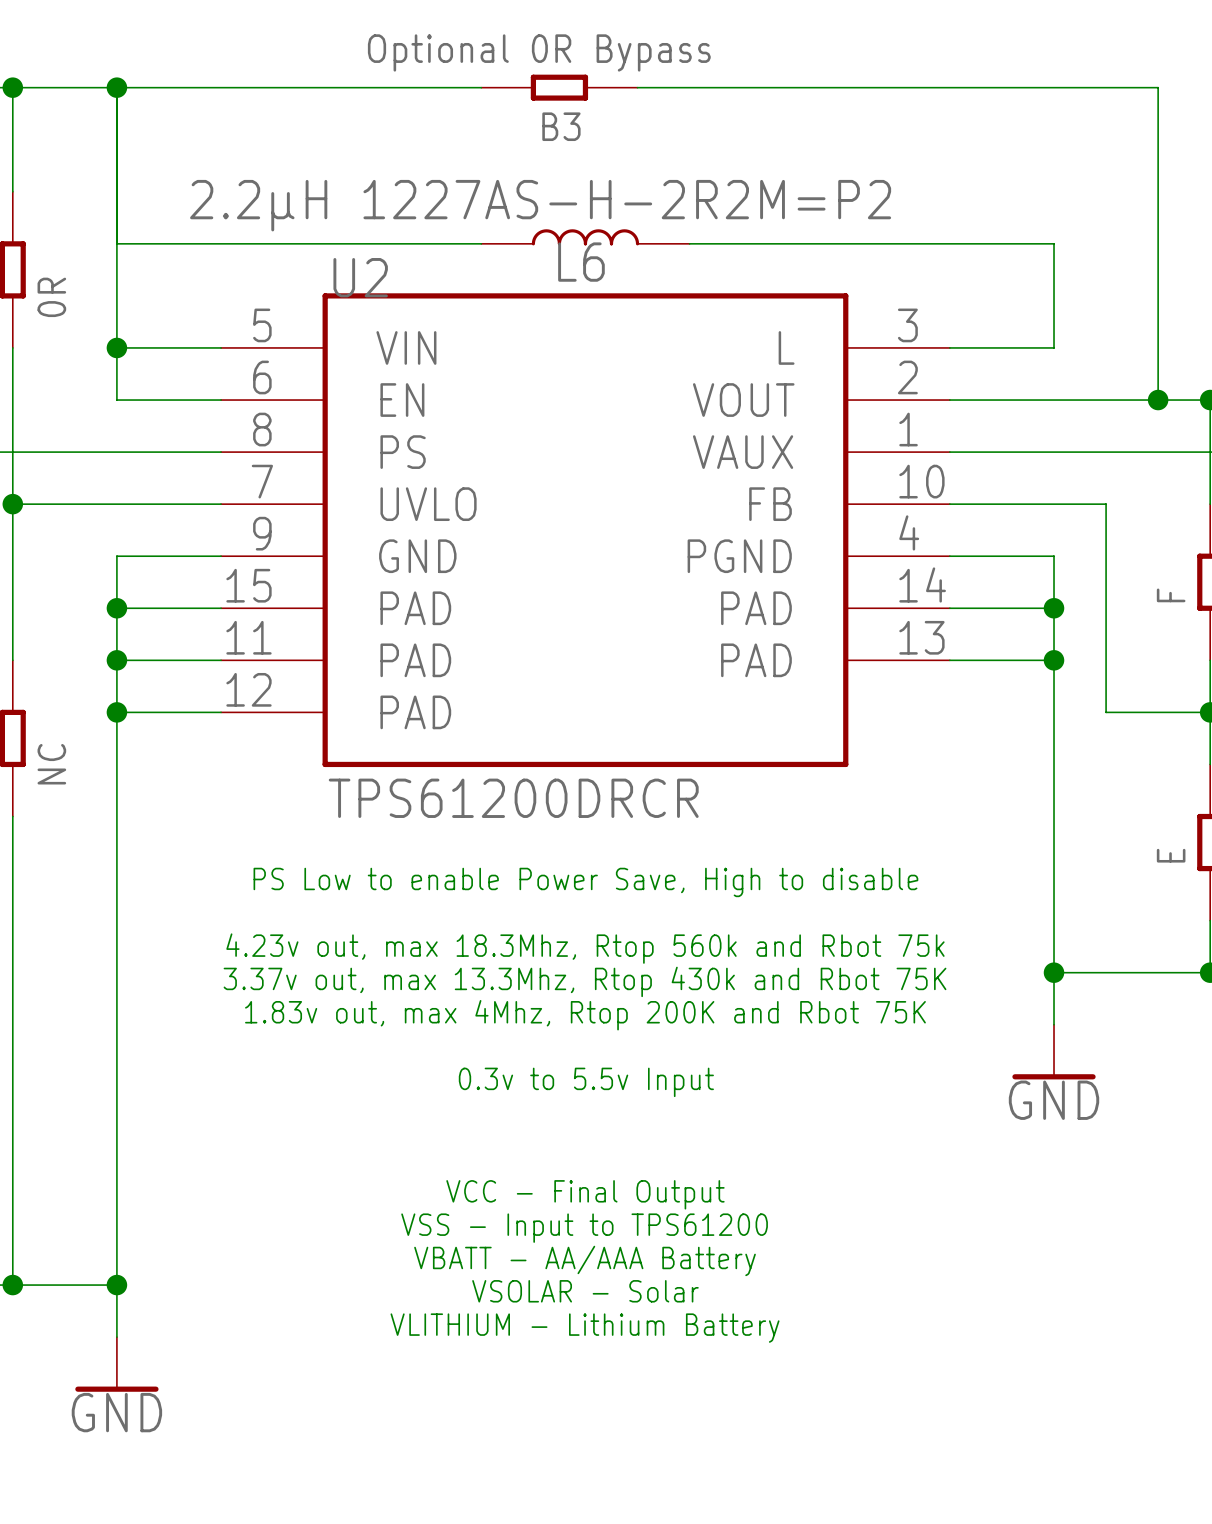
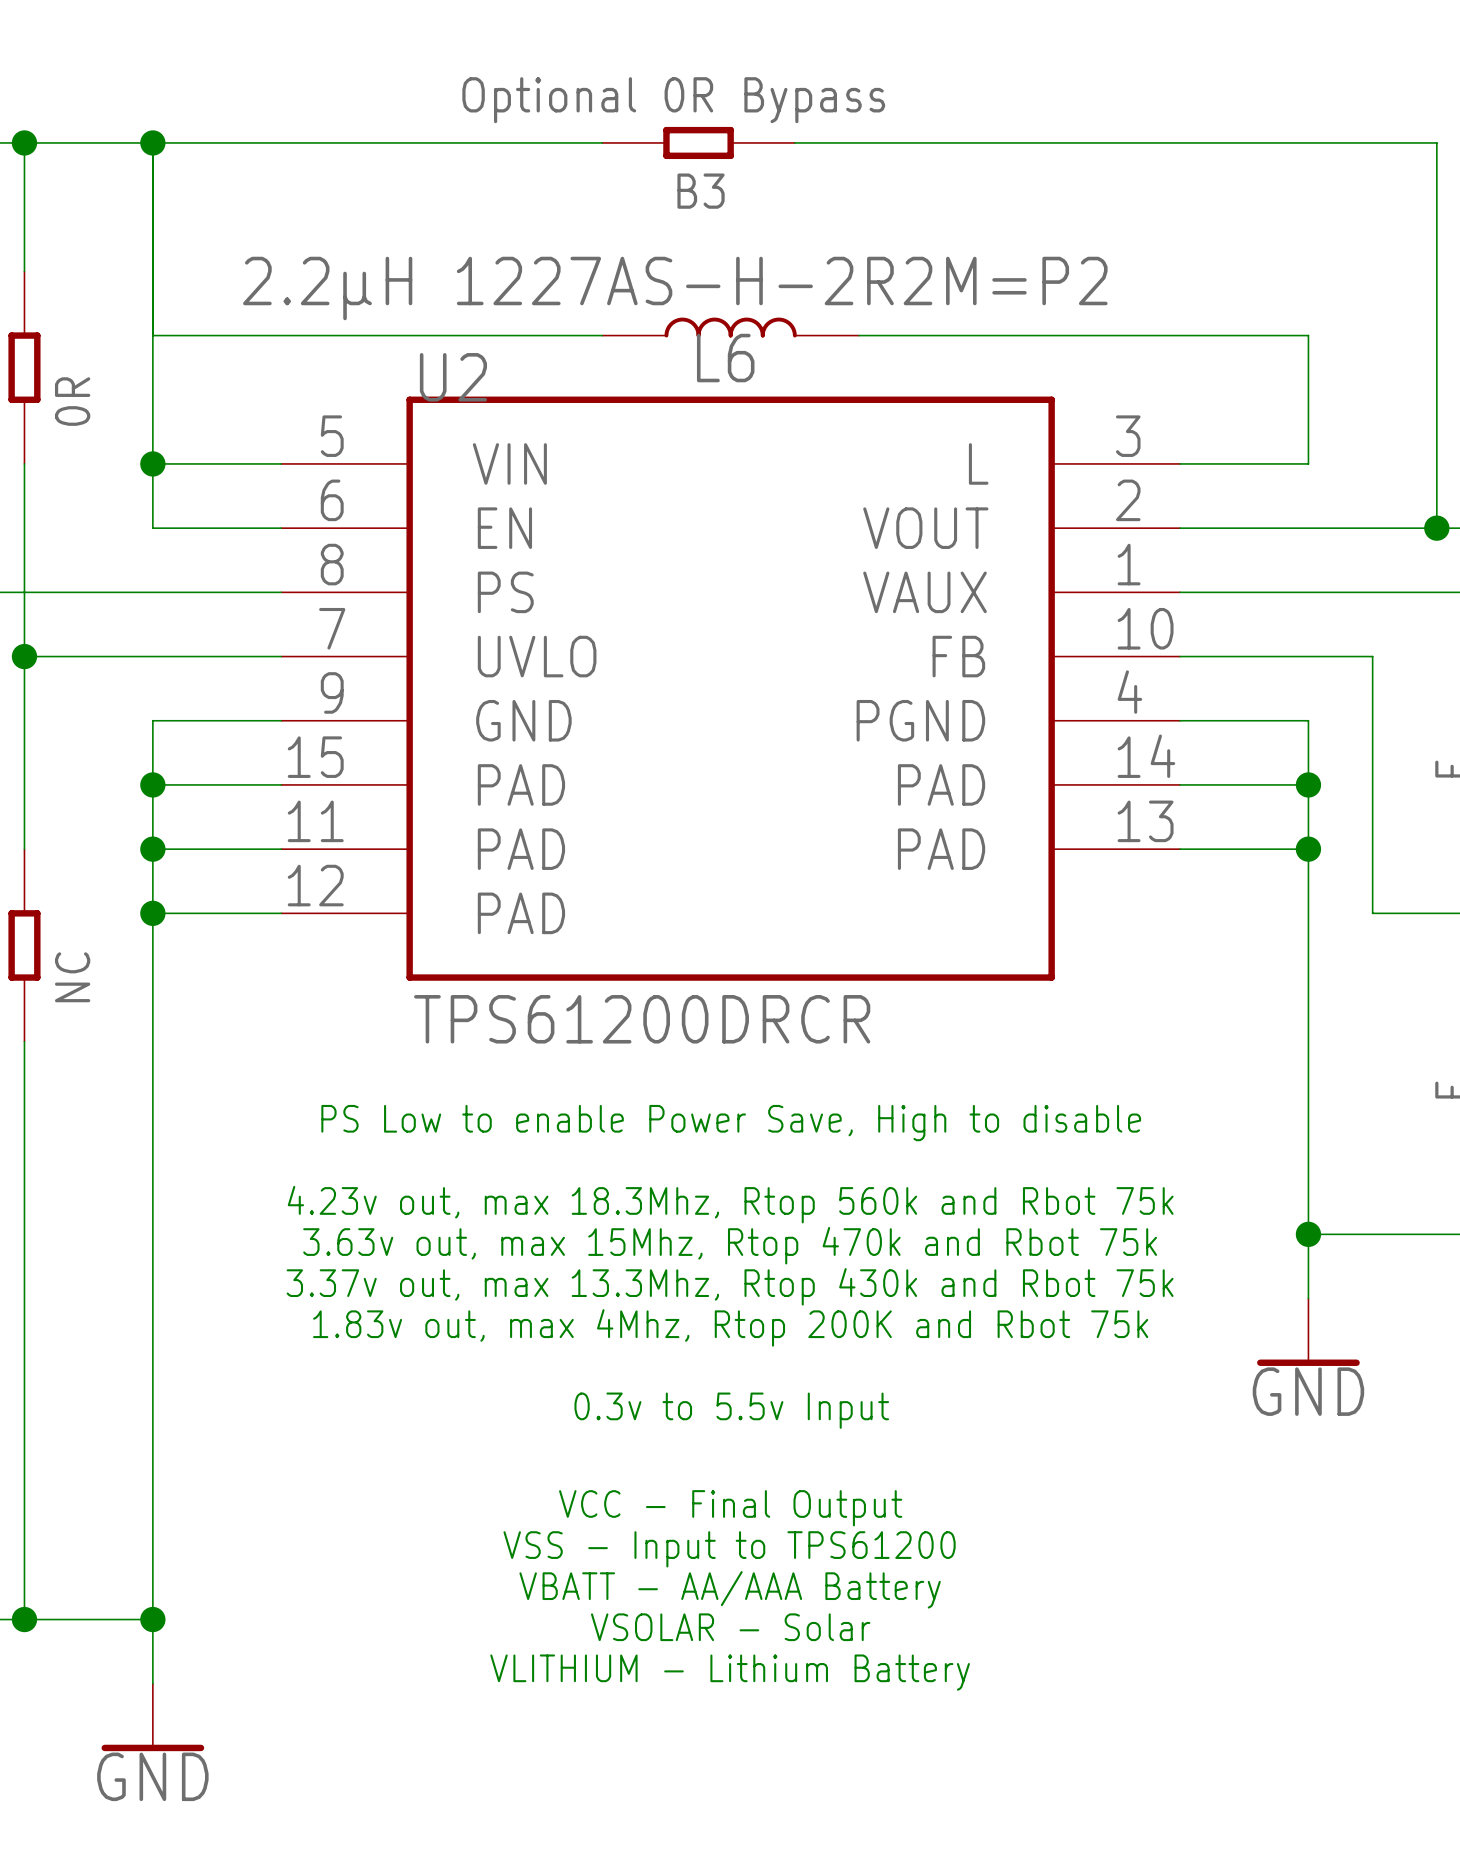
text: 3.37v out, max 13.3Mhz, Rtop 430k and Rbot 75K (585, 981) -> 3.63v out, max 15Mhz, Rtop 470k and Rbot 75k (730, 1245)
text: 1.83v out, max 4Mhz, Rtop 200K and Rbot 75K (585, 1015) -> 3.37v out, max 13.3Mhz, Rtop 430k and Rbot 75k (730, 1286)
text: none -> 1.83v out, max 4Mhz, Rtop 200K and Rbot 75k (730, 1327)
text position: 0.3v to 5.5v Input (586, 1082) -> 0.3v to 5.5v Input (731, 1410)

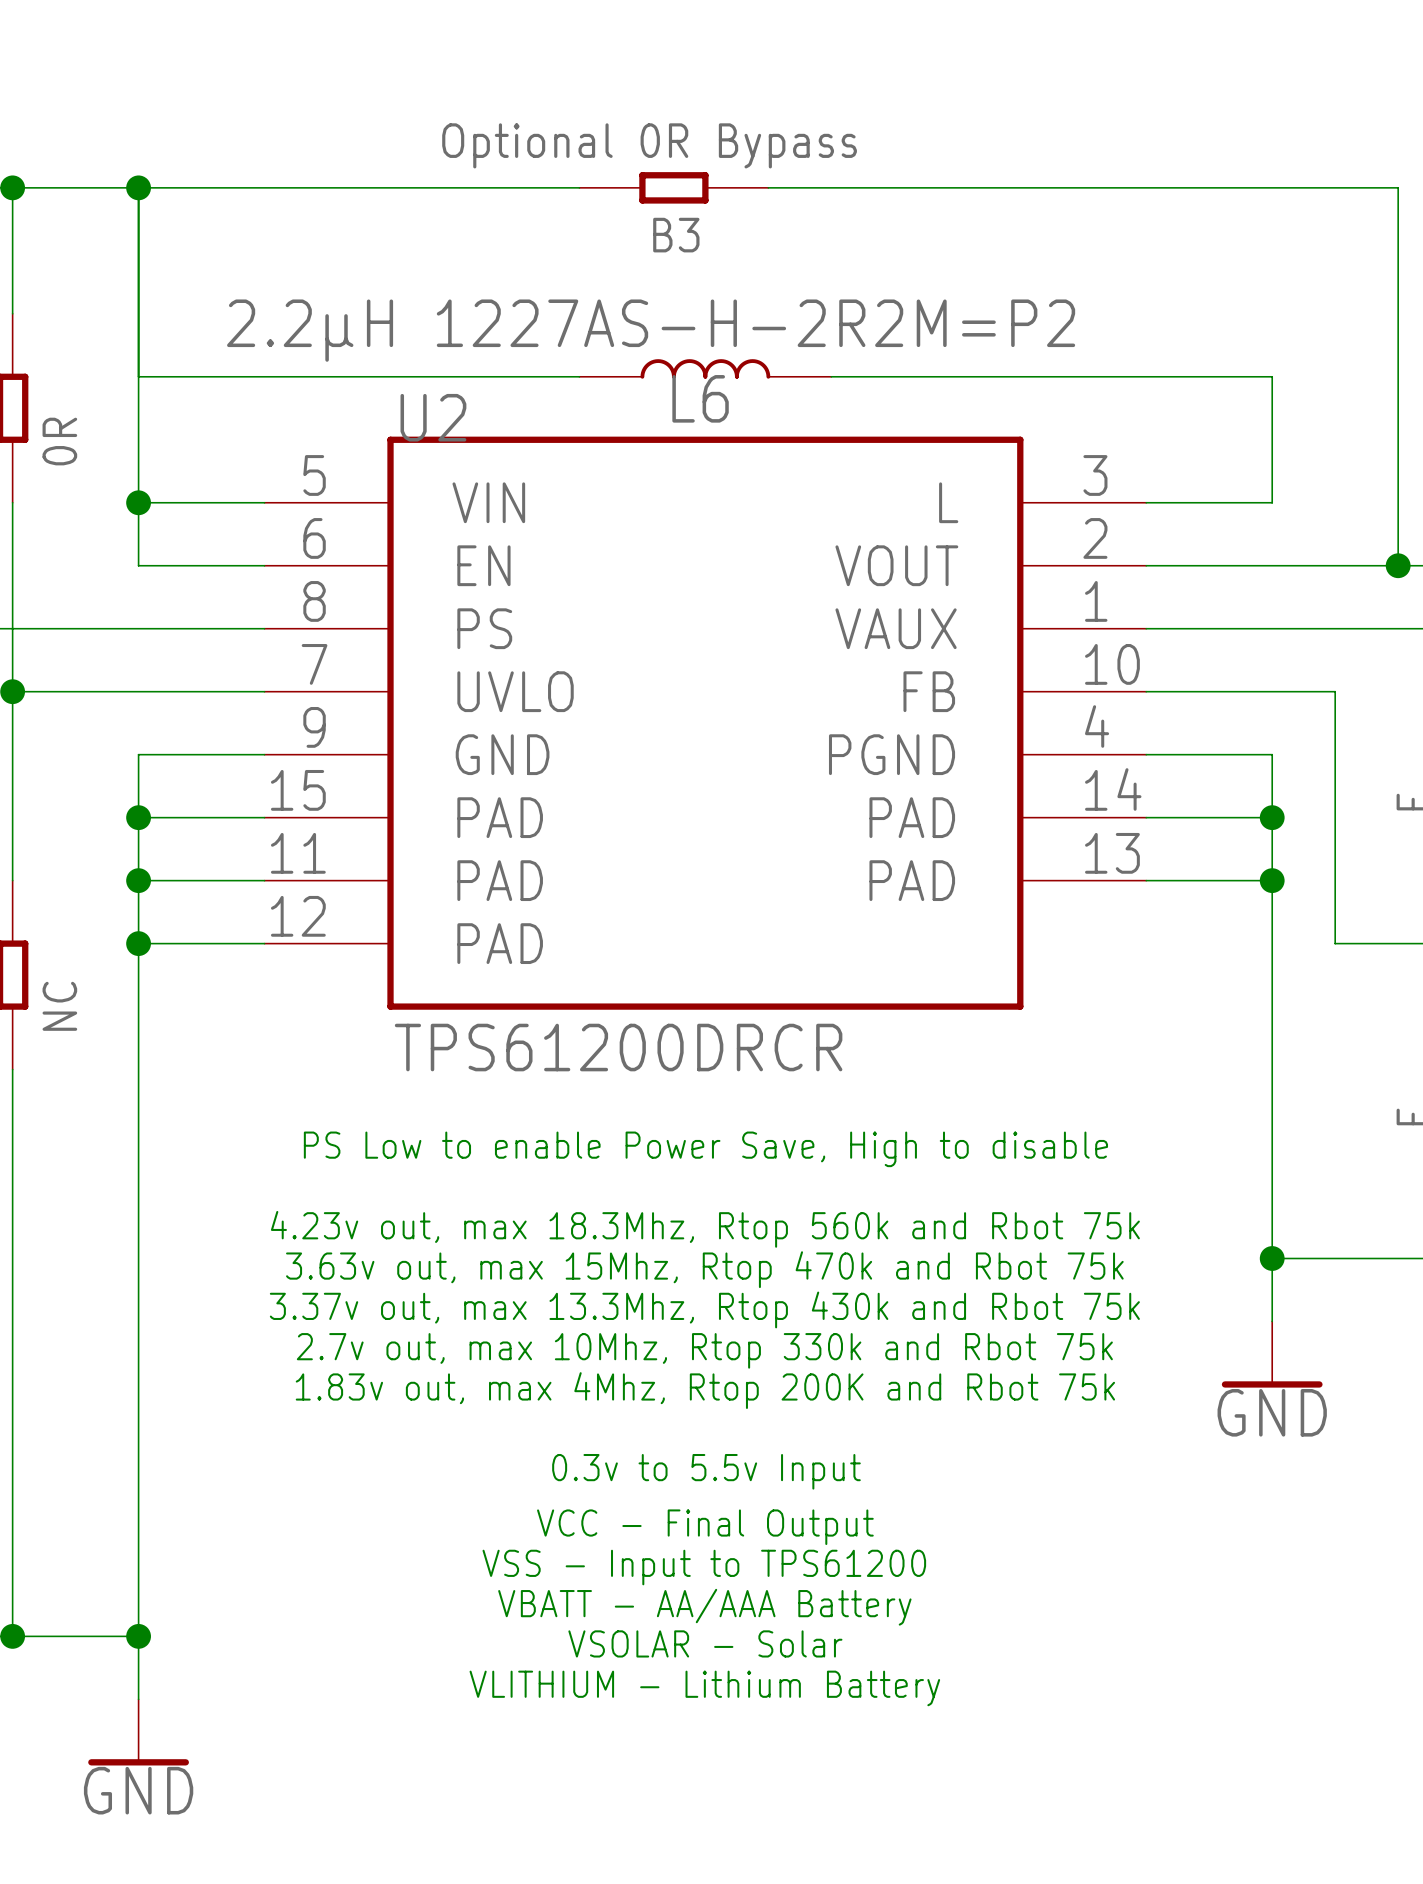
text: 1.83v out, max 4Mhz, Rtop 200K and Rbot 75k (730, 1327) -> 2.7v out, max 10Mhz, Rtop 330k and Rbot 75k (704, 1350)
text: none -> 1.83v out, max 4Mhz, Rtop 200K and Rbot 75k (705, 1390)
text position: 0.3v to 5.5v Input (731, 1410) -> 0.3v to 5.5v Input (706, 1471)

